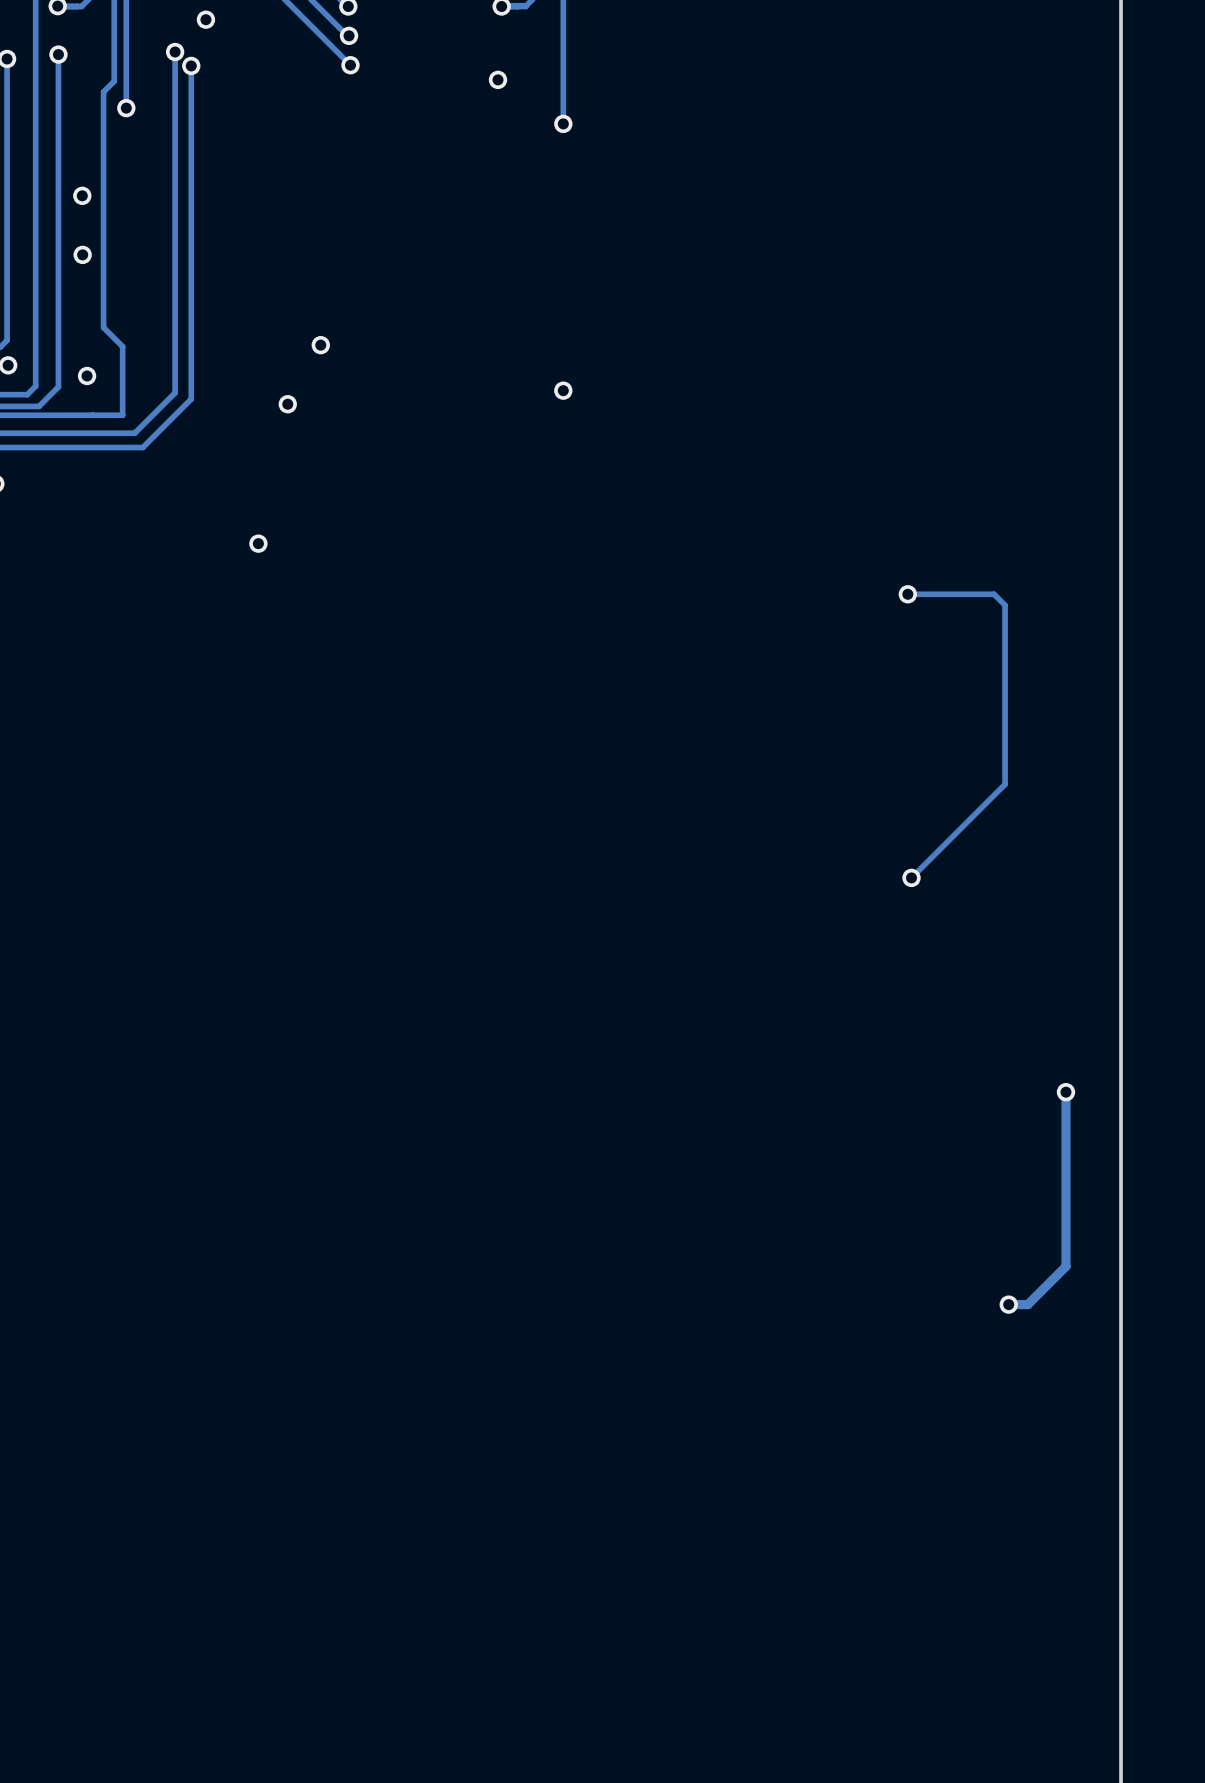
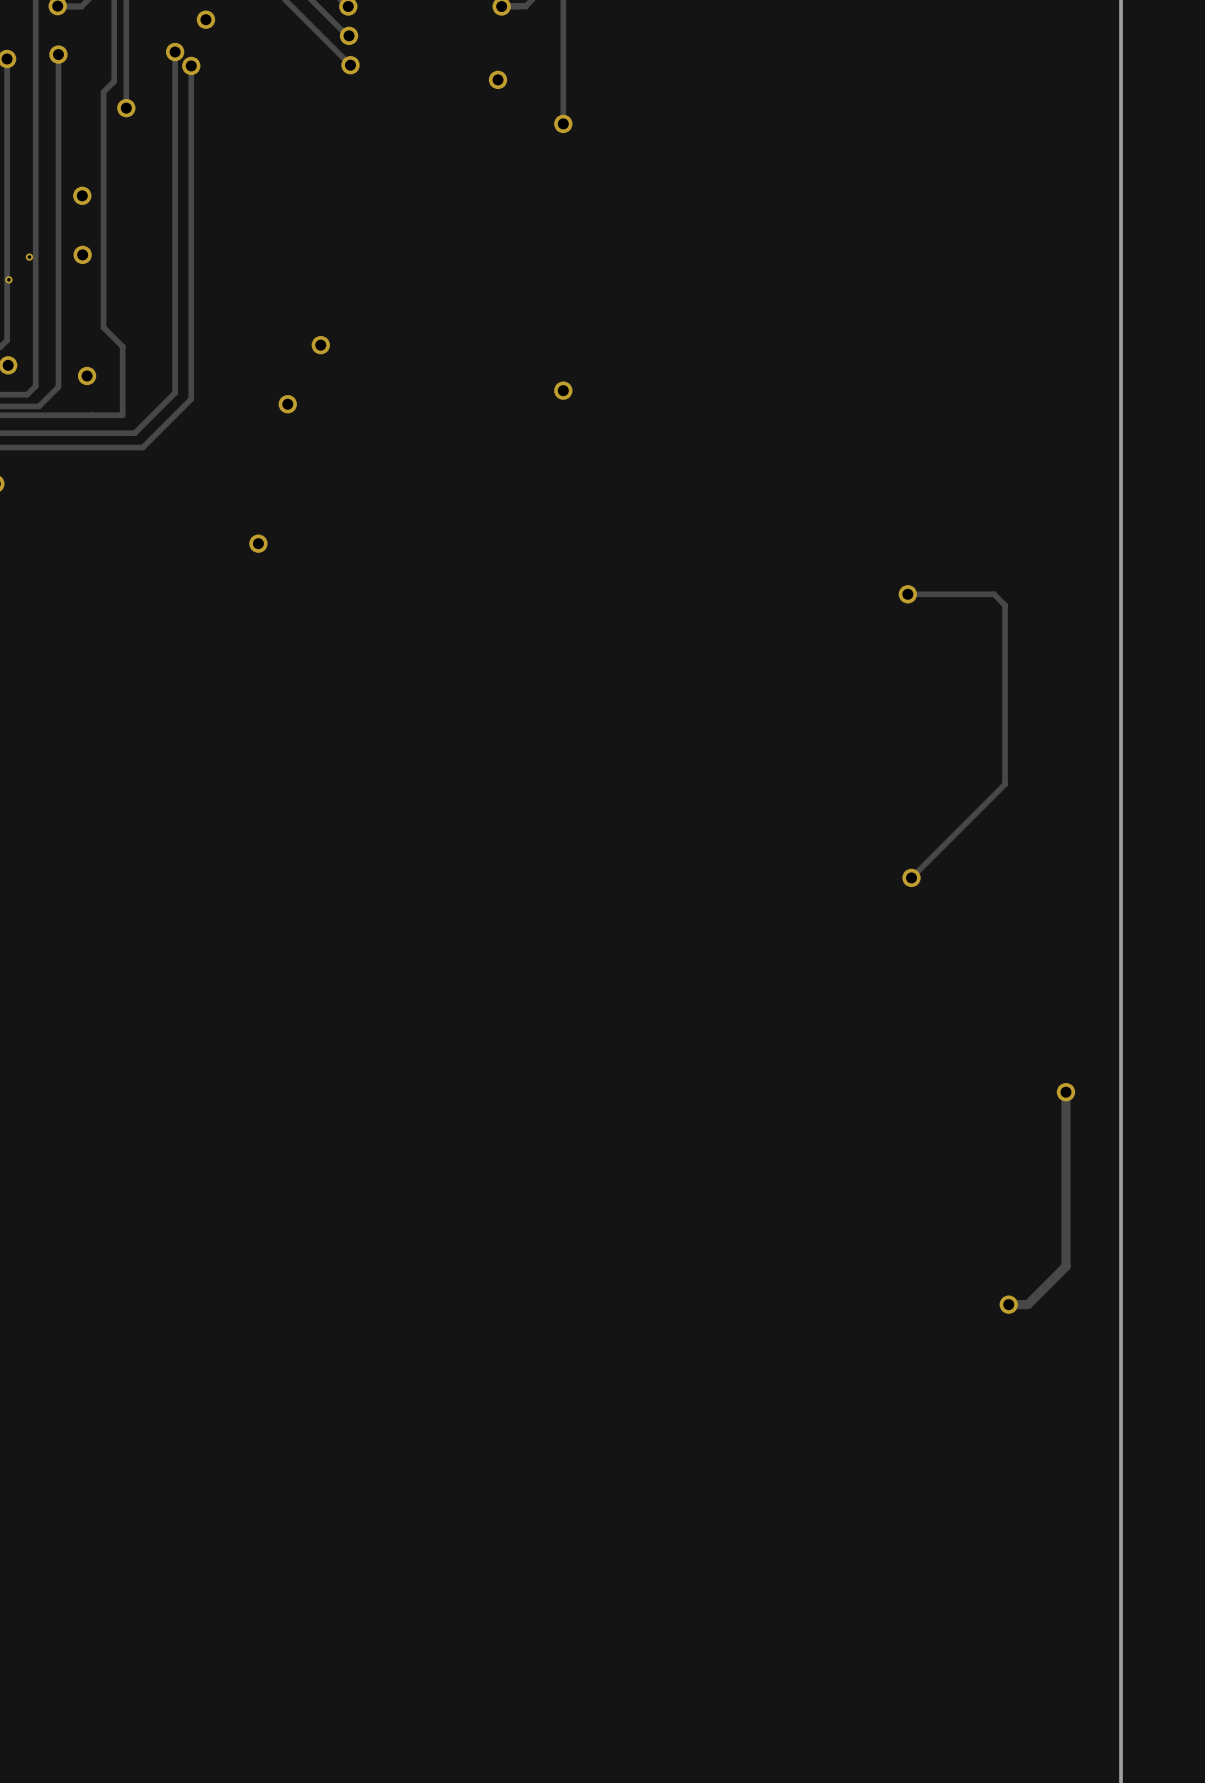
via: none -> (29, 257)
via: none -> (8, 279)

